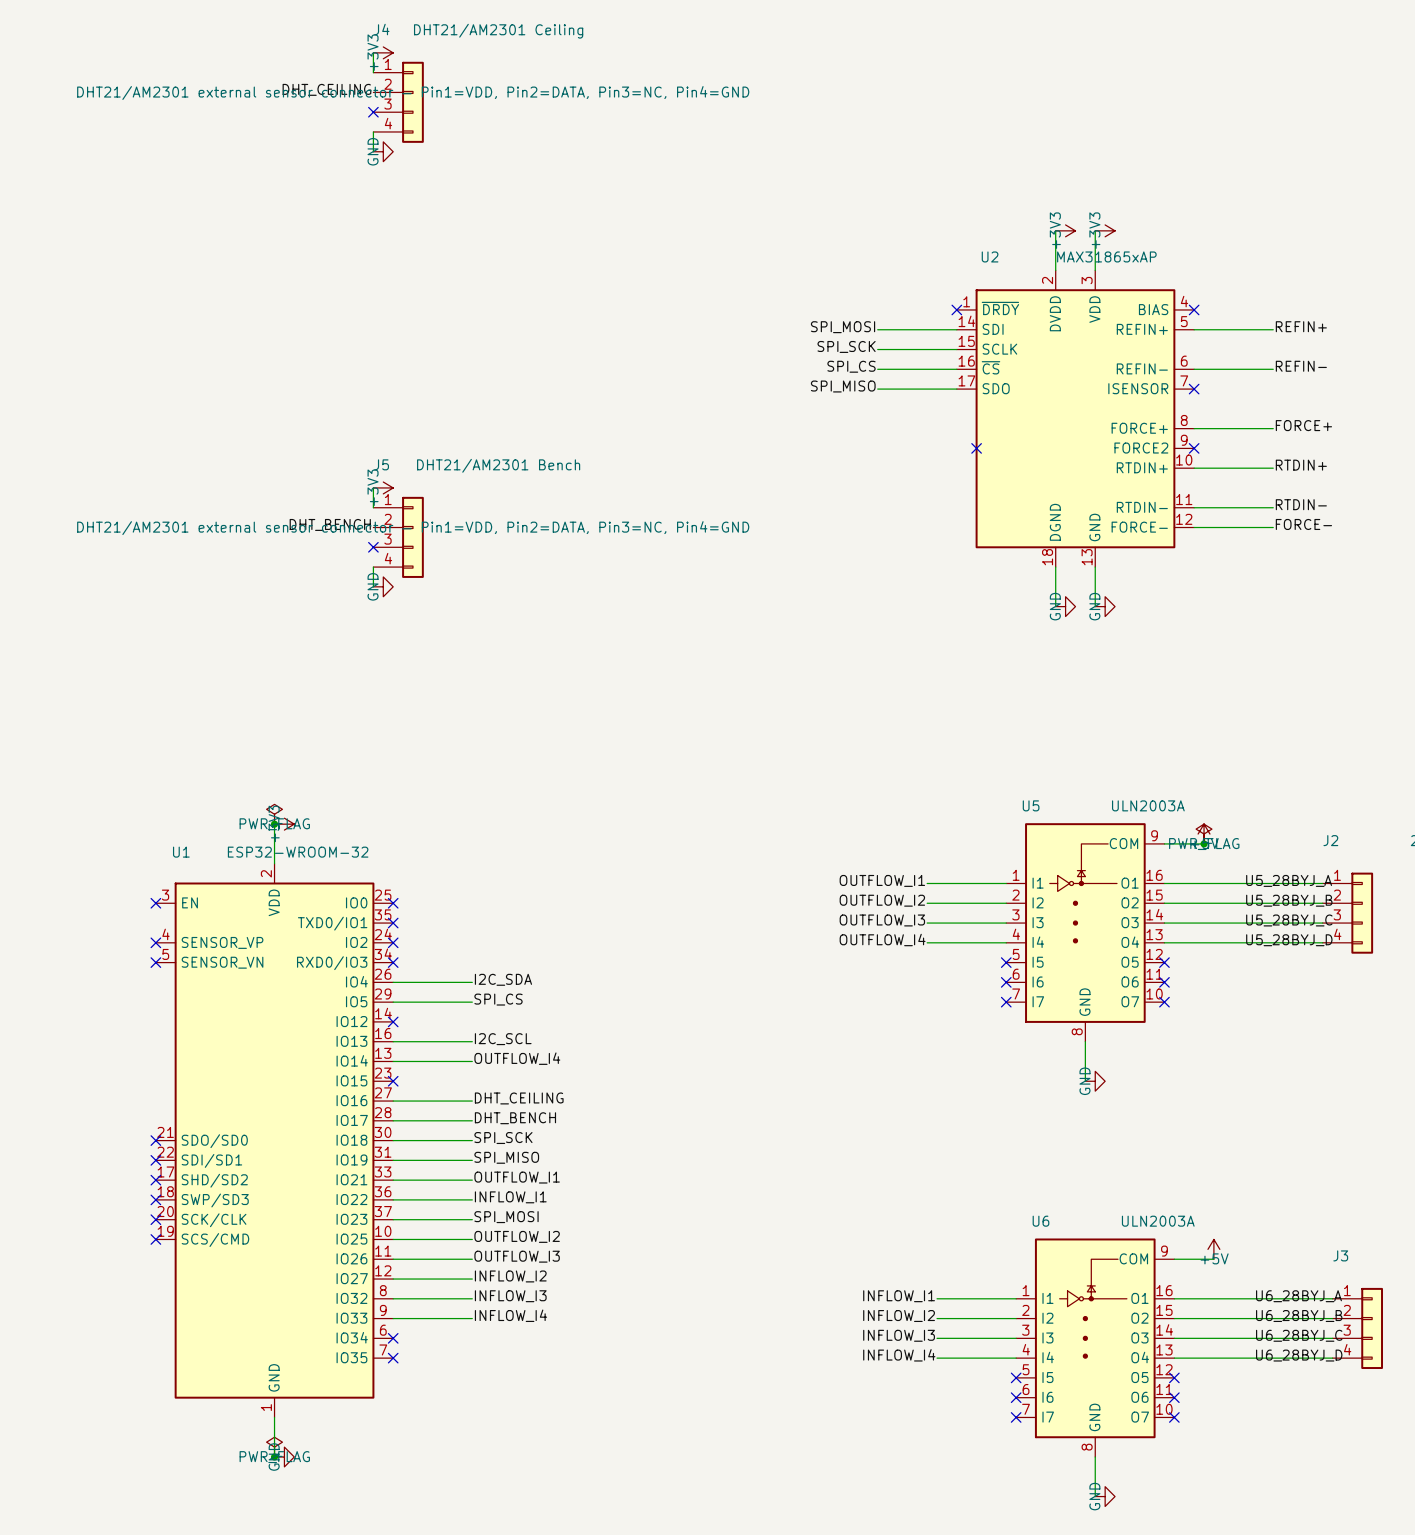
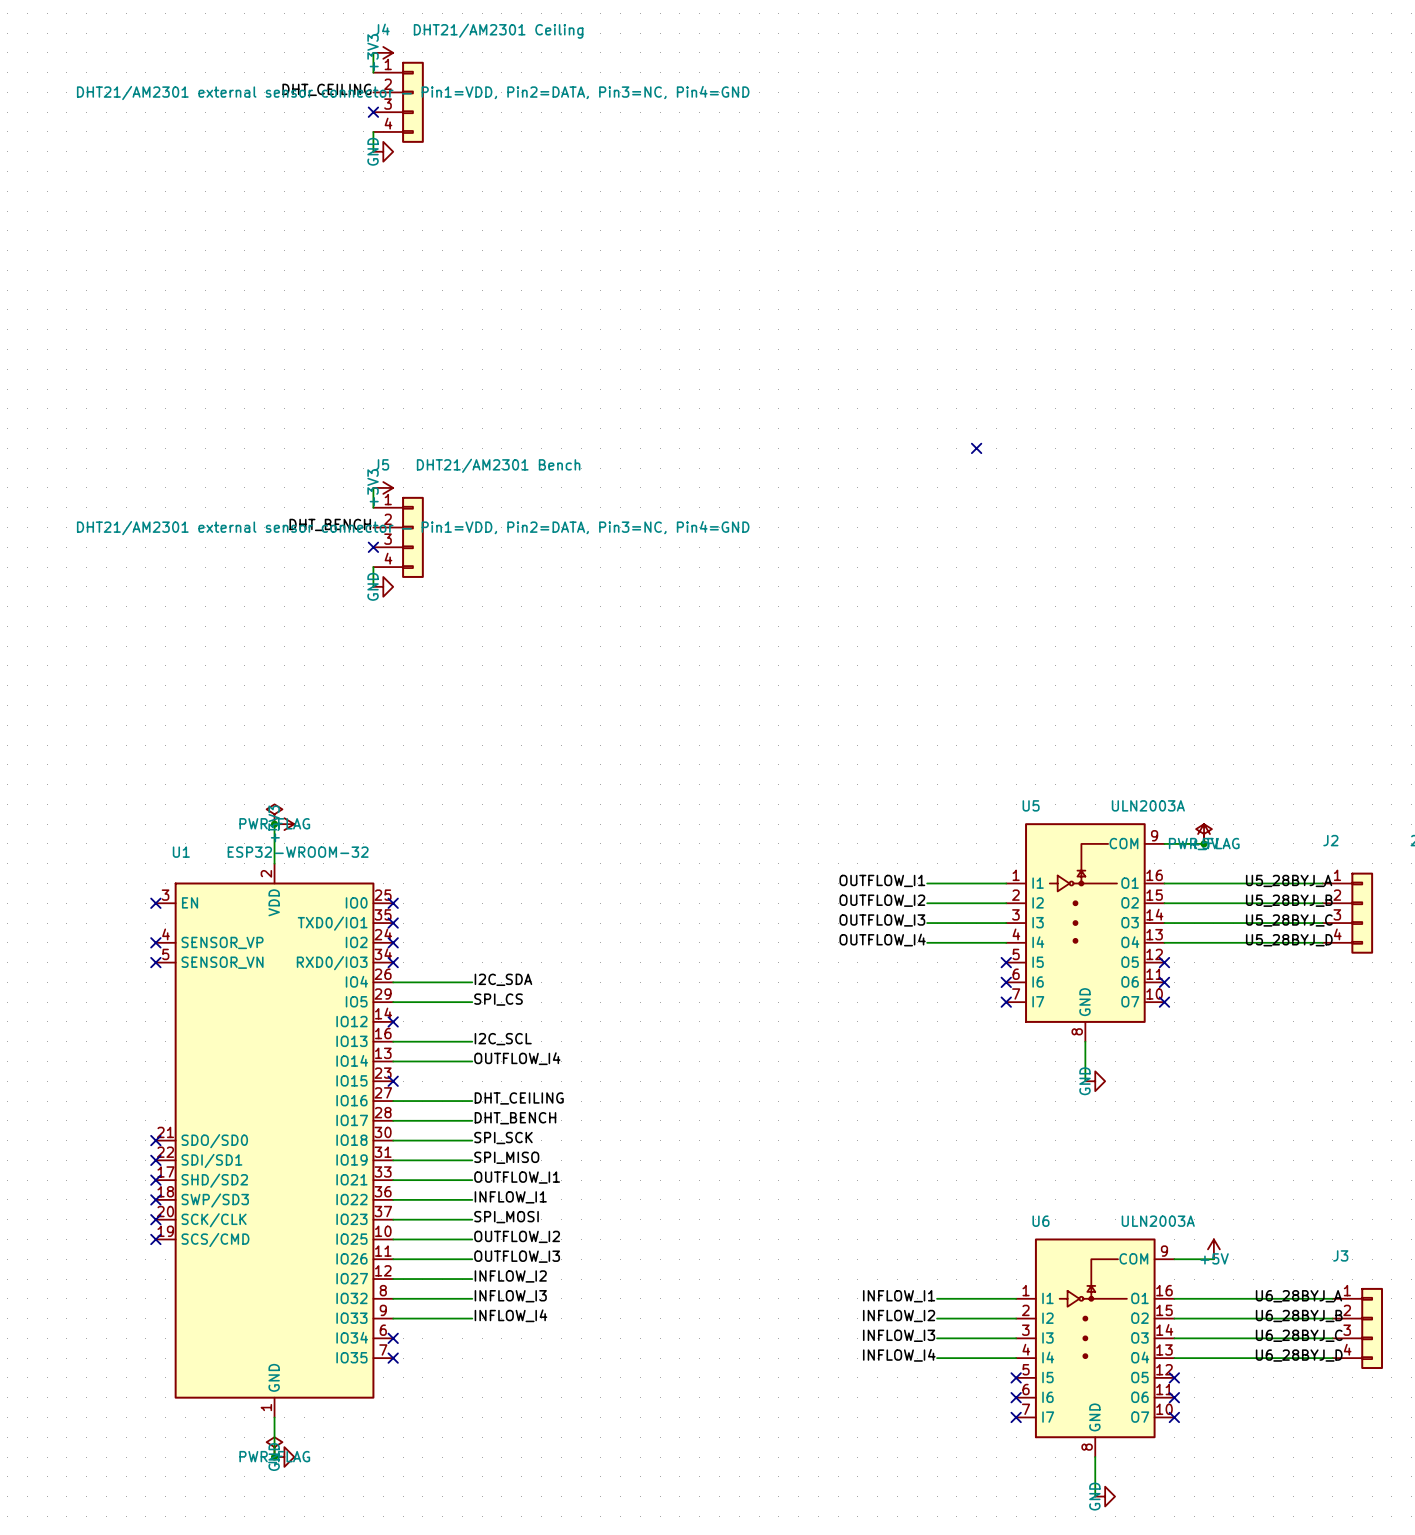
wire: (1055, 230) (1055, 270) -> none
power symbol: +3V3 (1065, 230) -> none
wire: (1095, 230) (1095, 270) -> none
power symbol: +3V3 (1105, 230) -> none
no-connect mark: (956, 309) -> none
no-connect mark: (1194, 309) -> none
label: REFIN+ (1301, 326) -> none
label: SPI_MOSI (843, 327) -> none
wire: (877, 329) (956, 329) -> none
wire: (1194, 329) (1273, 329) -> none
label: SPI_SCK (846, 346) -> none
wire: (877, 349) (956, 349) -> none
label: SPI_CS (851, 366) -> none
label: REFIN- (1301, 366) -> none
wire: (877, 369) (956, 369) -> none
wire: (1194, 369) (1273, 369) -> none
label: SPI_MISO (843, 386) -> none
wire: (877, 389) (956, 389) -> none
no-connect mark: (1194, 389) -> none
U2: MAX31865xAP (1075, 418) -> none
label: FORCE+ (1303, 425) -> none
wire: (1194, 428) (1273, 428) -> none
no-connect mark: (1194, 448) -> none
label: RTDIN+ (1301, 465) -> none
wire: (1194, 468) (1273, 468) -> none
label: RTDIN- (1301, 504) -> none
wire: (1194, 507) (1273, 507) -> none
label: FORCE- (1303, 524) -> none
wire: (1194, 527) (1273, 527) -> none
wire: (1055, 567) (1055, 606) -> none
wire: (1095, 567) (1095, 606) -> none
power symbol: GND (1065, 606) -> none
power symbol: GND (1105, 606) -> none

